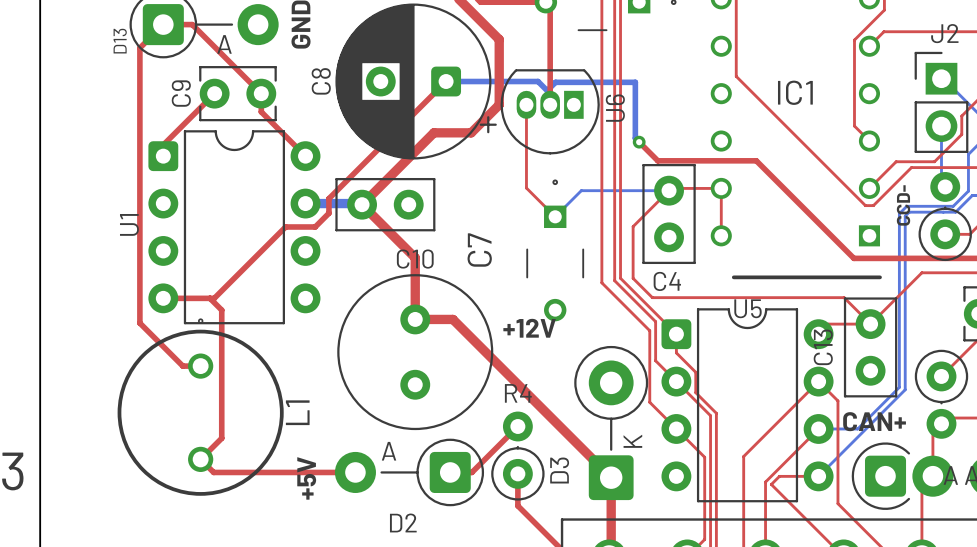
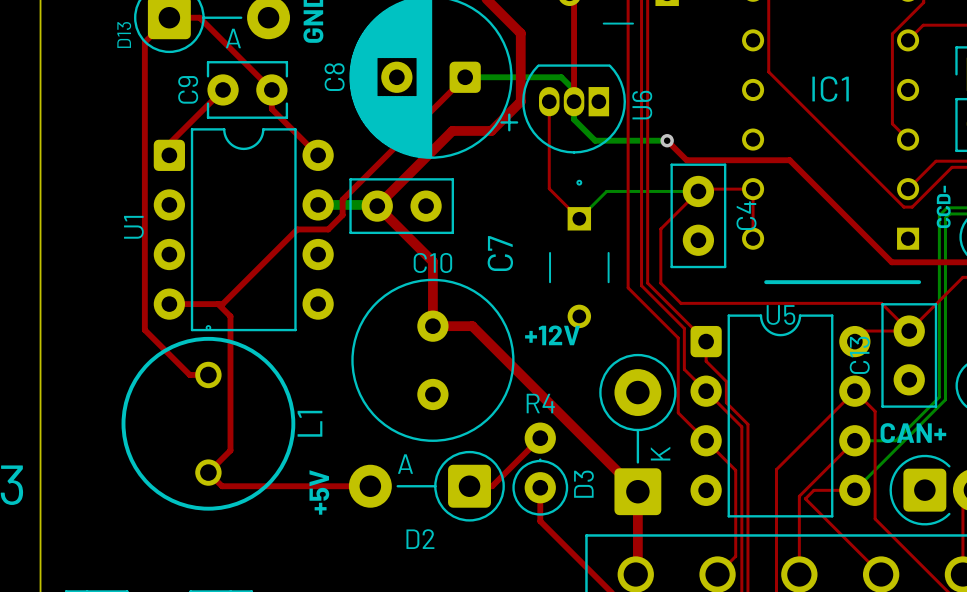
bottom track: (550, 93) (550, 87) (555, 82) (635, 82) (635, 138) (639, 142) -> (574, 101) (574, 119) (595, 140) (667, 140)
C4 name rotation: 0° (667, 281) -> 90° counterclockwise (746, 215)
C4 name position: C4 (667, 281) -> C4 (746, 215)

